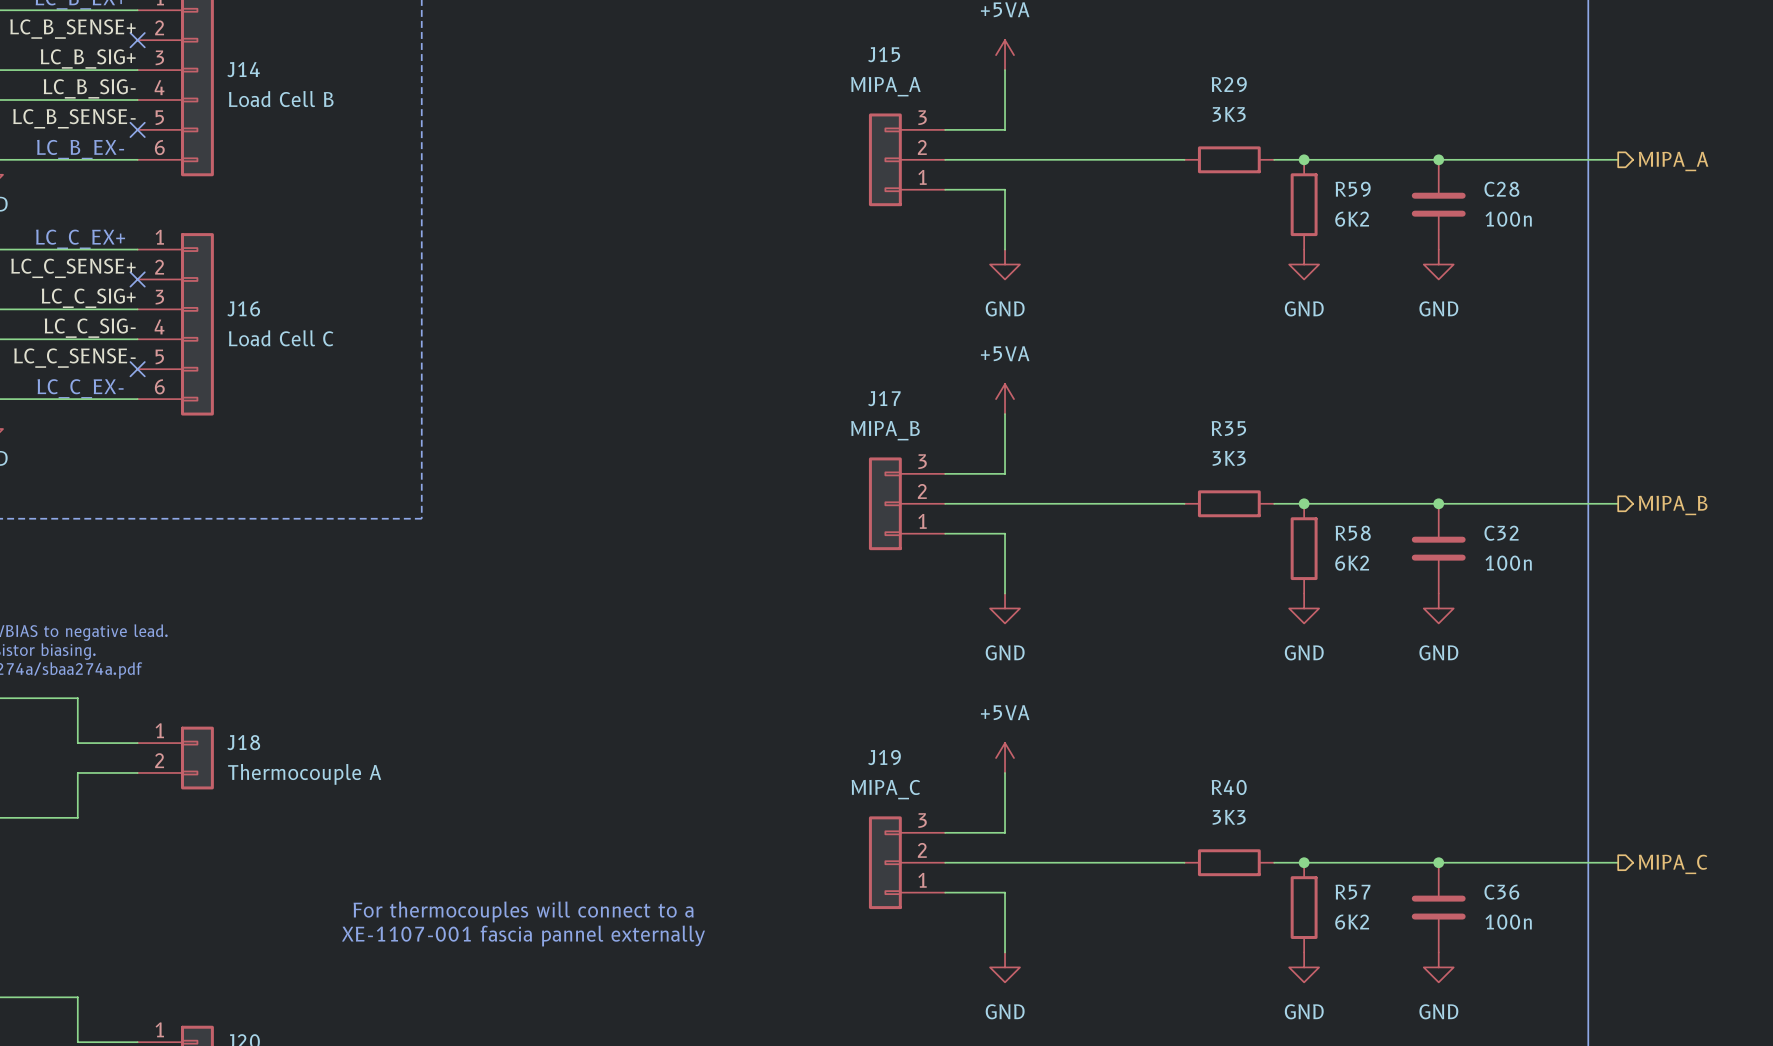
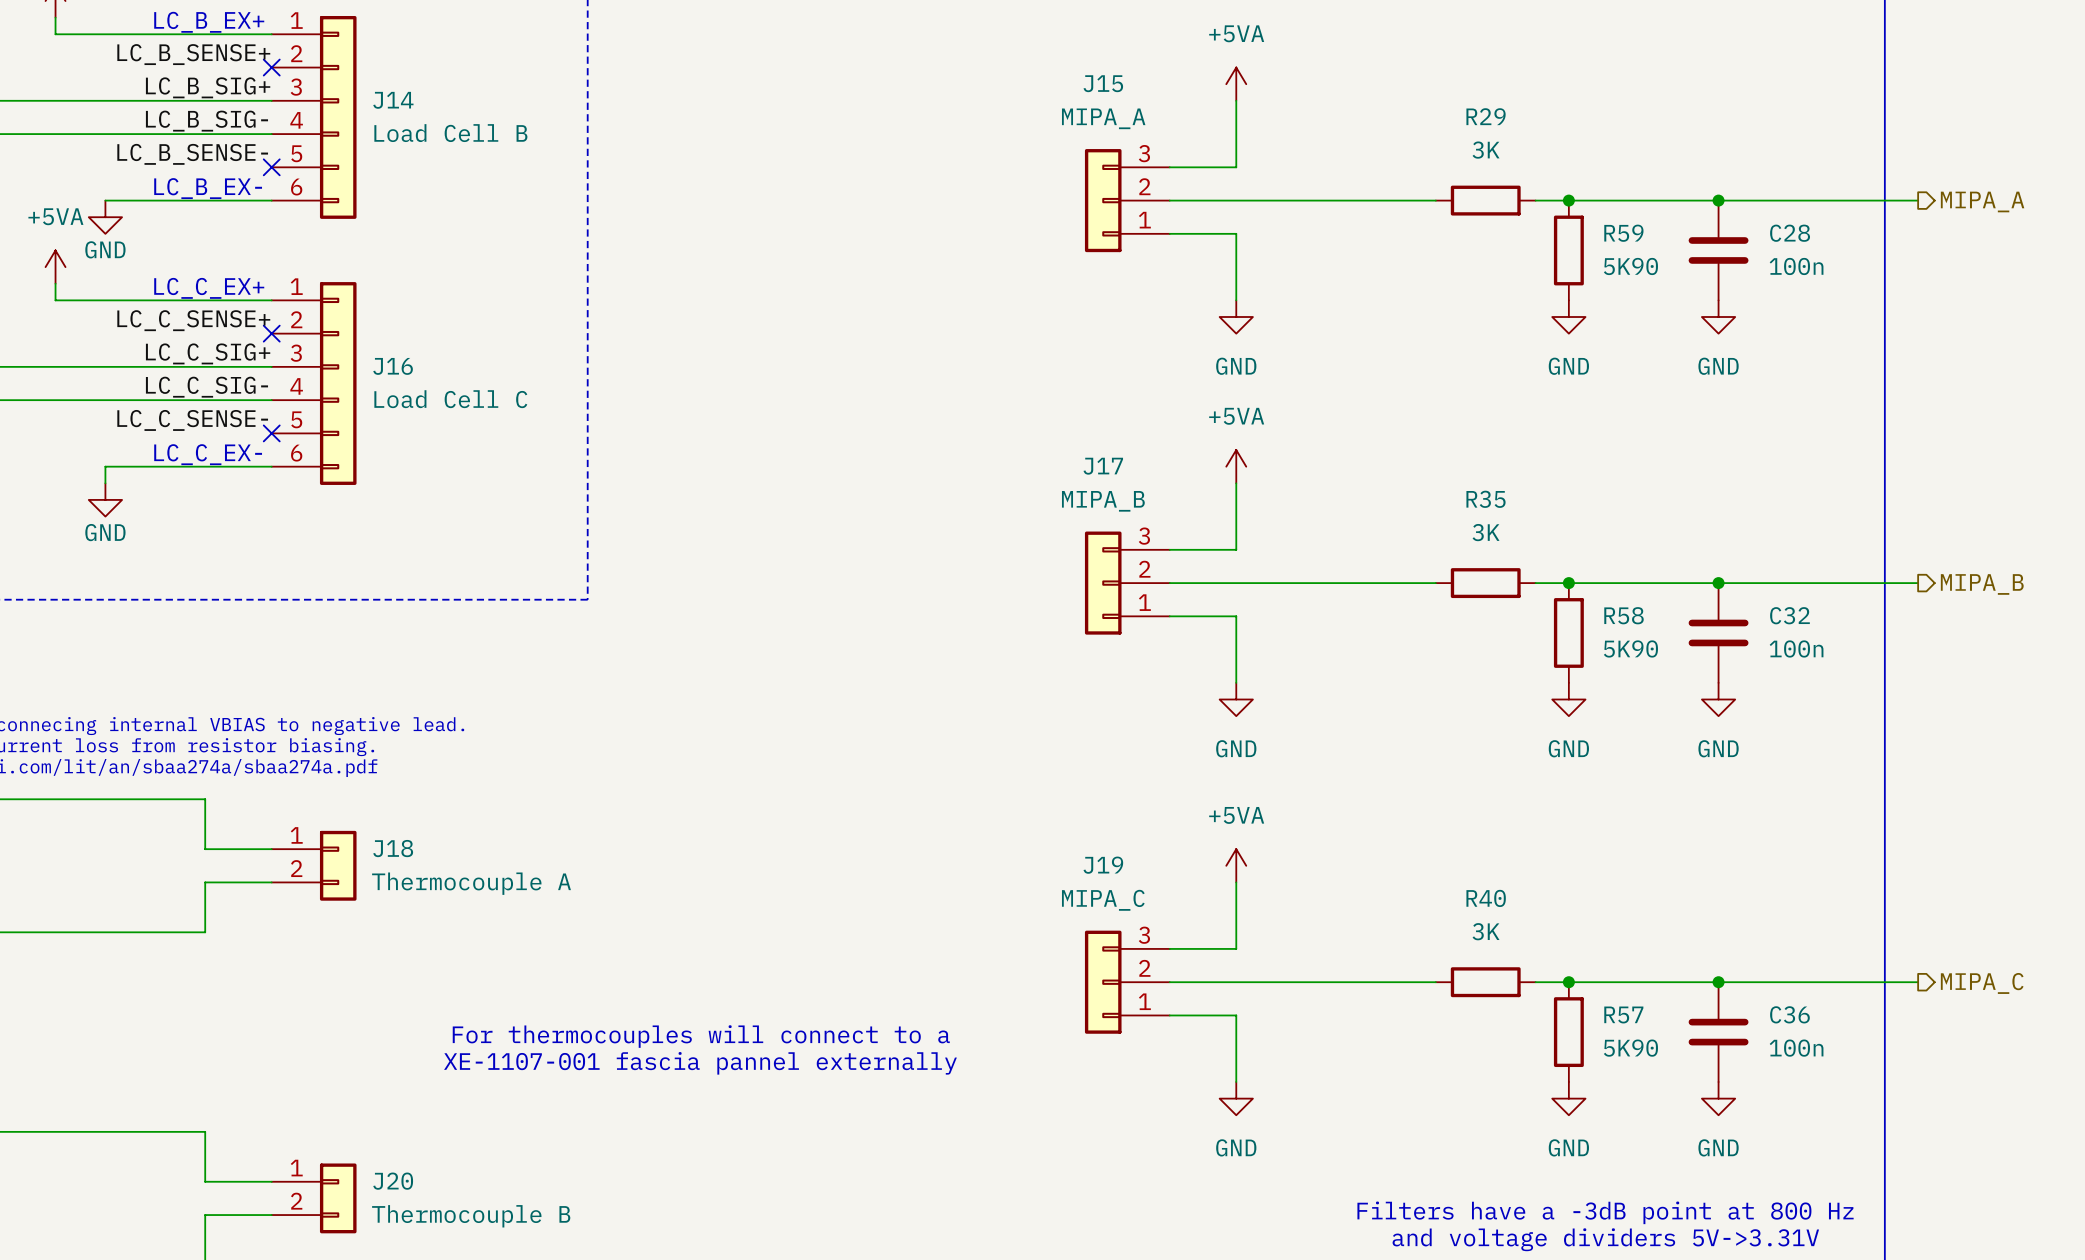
R29 value: 3K3 (1229, 114) -> 3K (1486, 150)
R59 value: 6K2 (1352, 219) -> 5K90 (1630, 266)
R35 value: 3K3 (1229, 458) -> 3K (1486, 532)
R58 value: 6K2 (1352, 563) -> 5K90 (1630, 648)
R40 value: 3K3 (1229, 817) -> 3K (1486, 931)
R57 value: 6K2 (1352, 922) -> 5K90 (1630, 1048)

